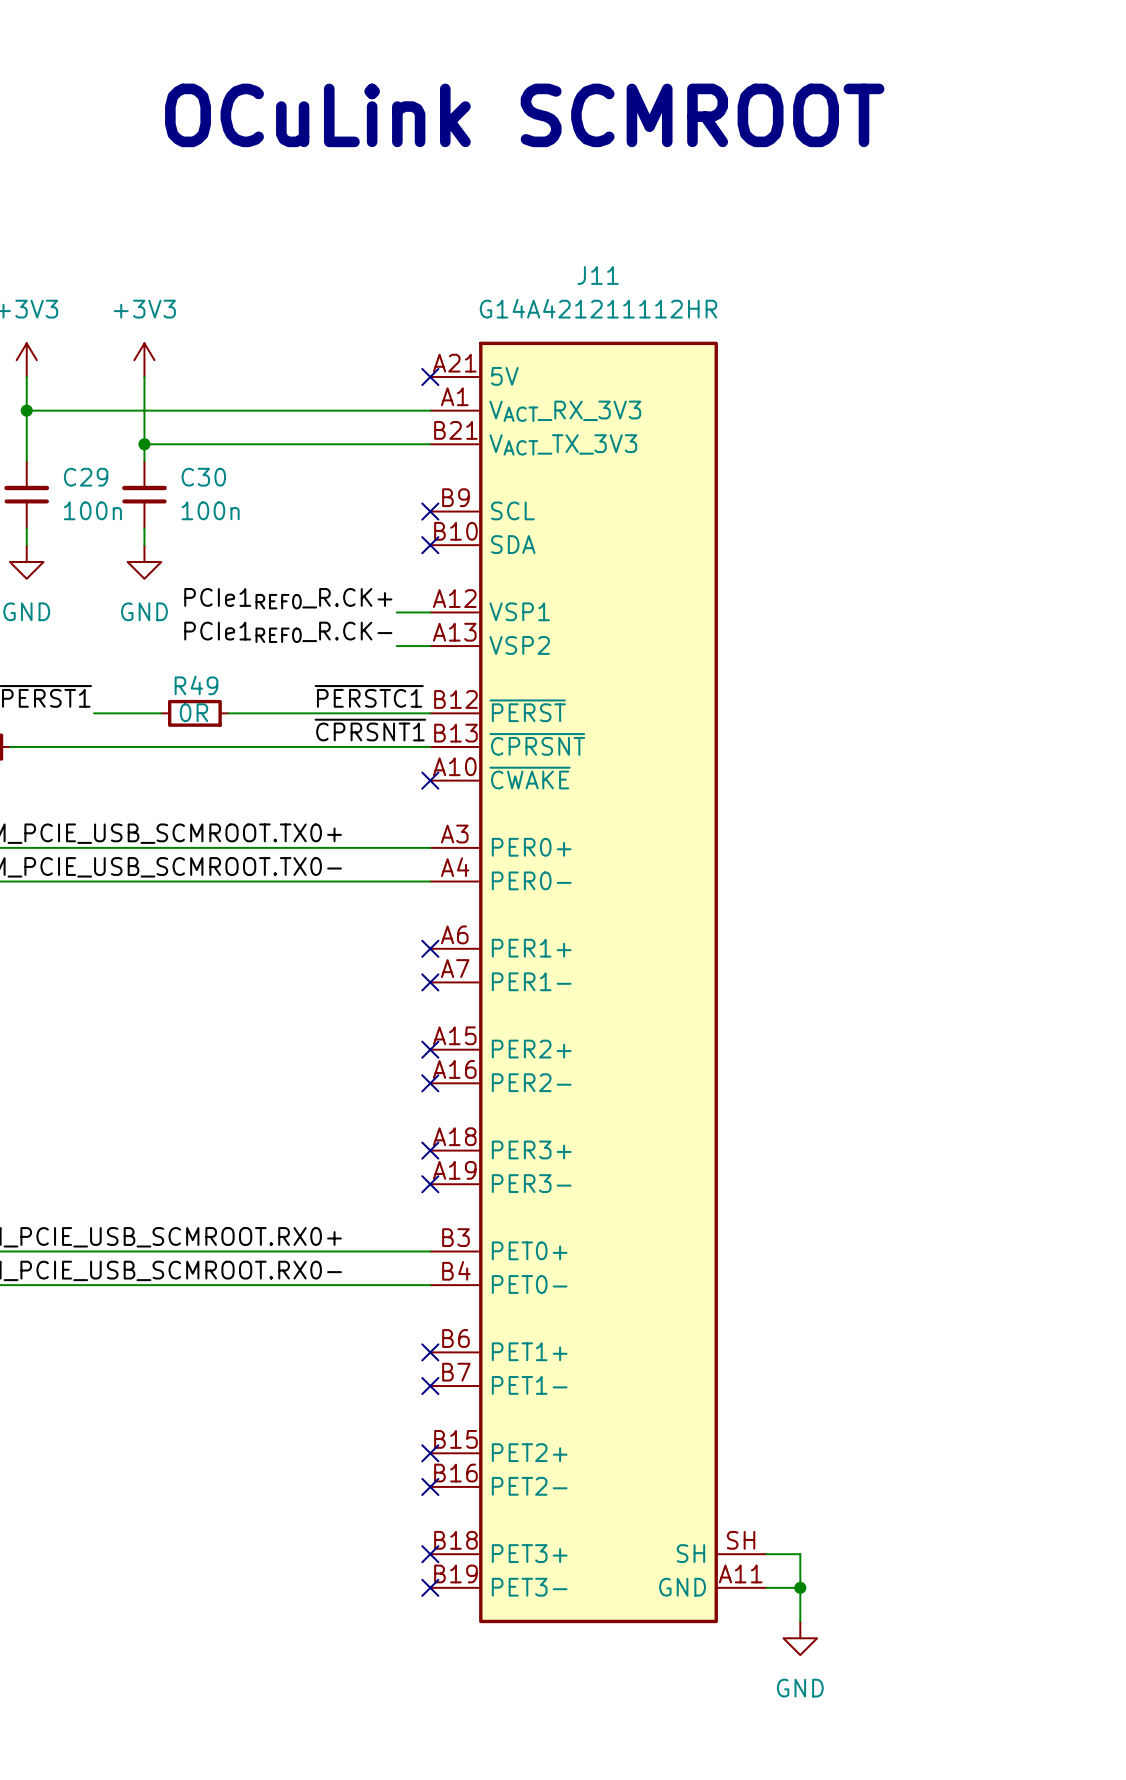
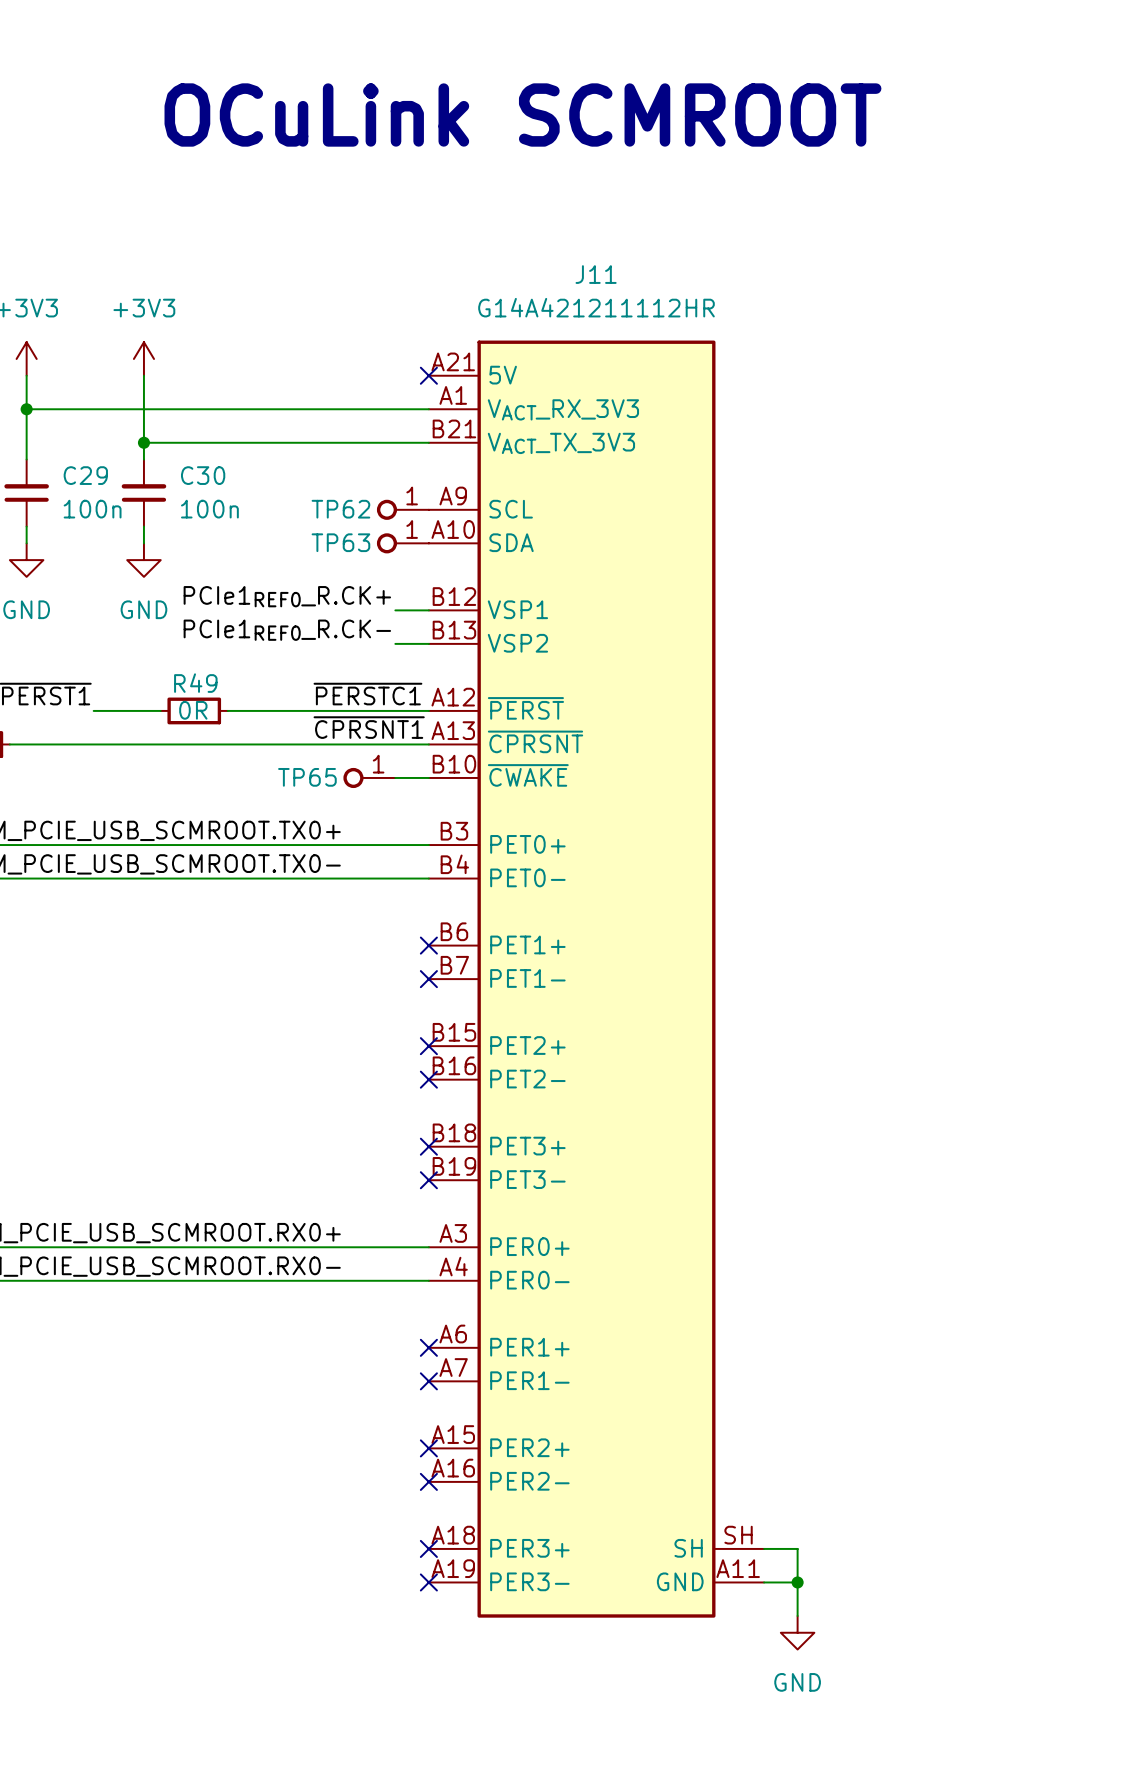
J11 symbol: [430, 341, 767, 1624] -> [428, 340, 765, 1618]
TP62: none -> (402, 509)
no-connect mark: (430, 511) -> none
TP63: none -> (402, 543)
no-connect mark: (430, 545) -> none
TP65: none -> (369, 777)
wire: none -> (395, 777) (428, 777)
no-connect mark: (430, 780) -> none

